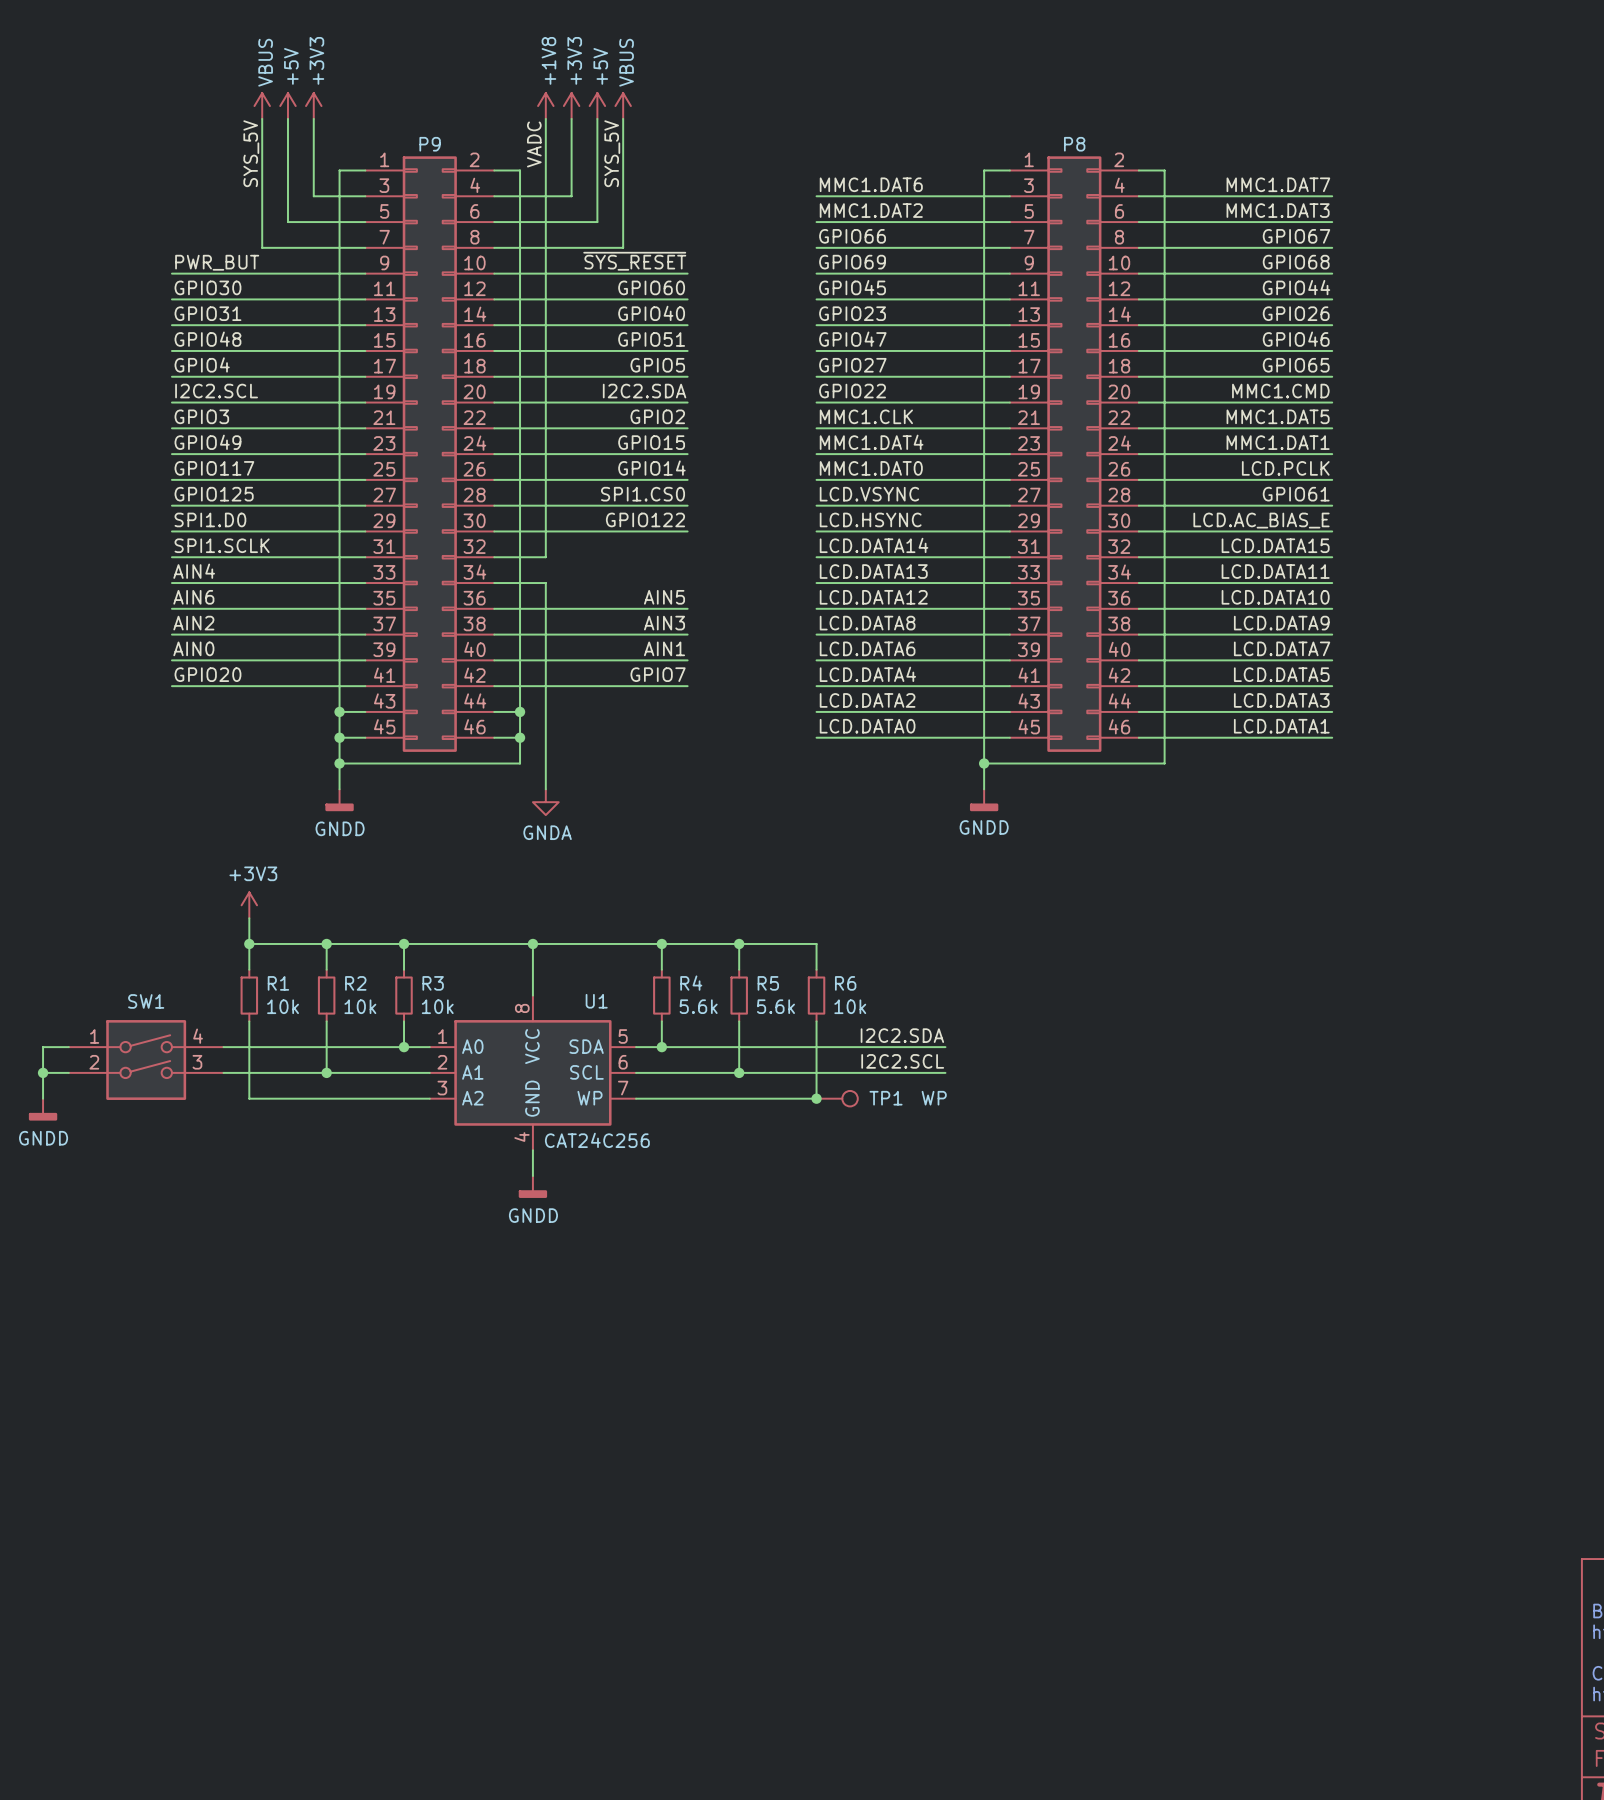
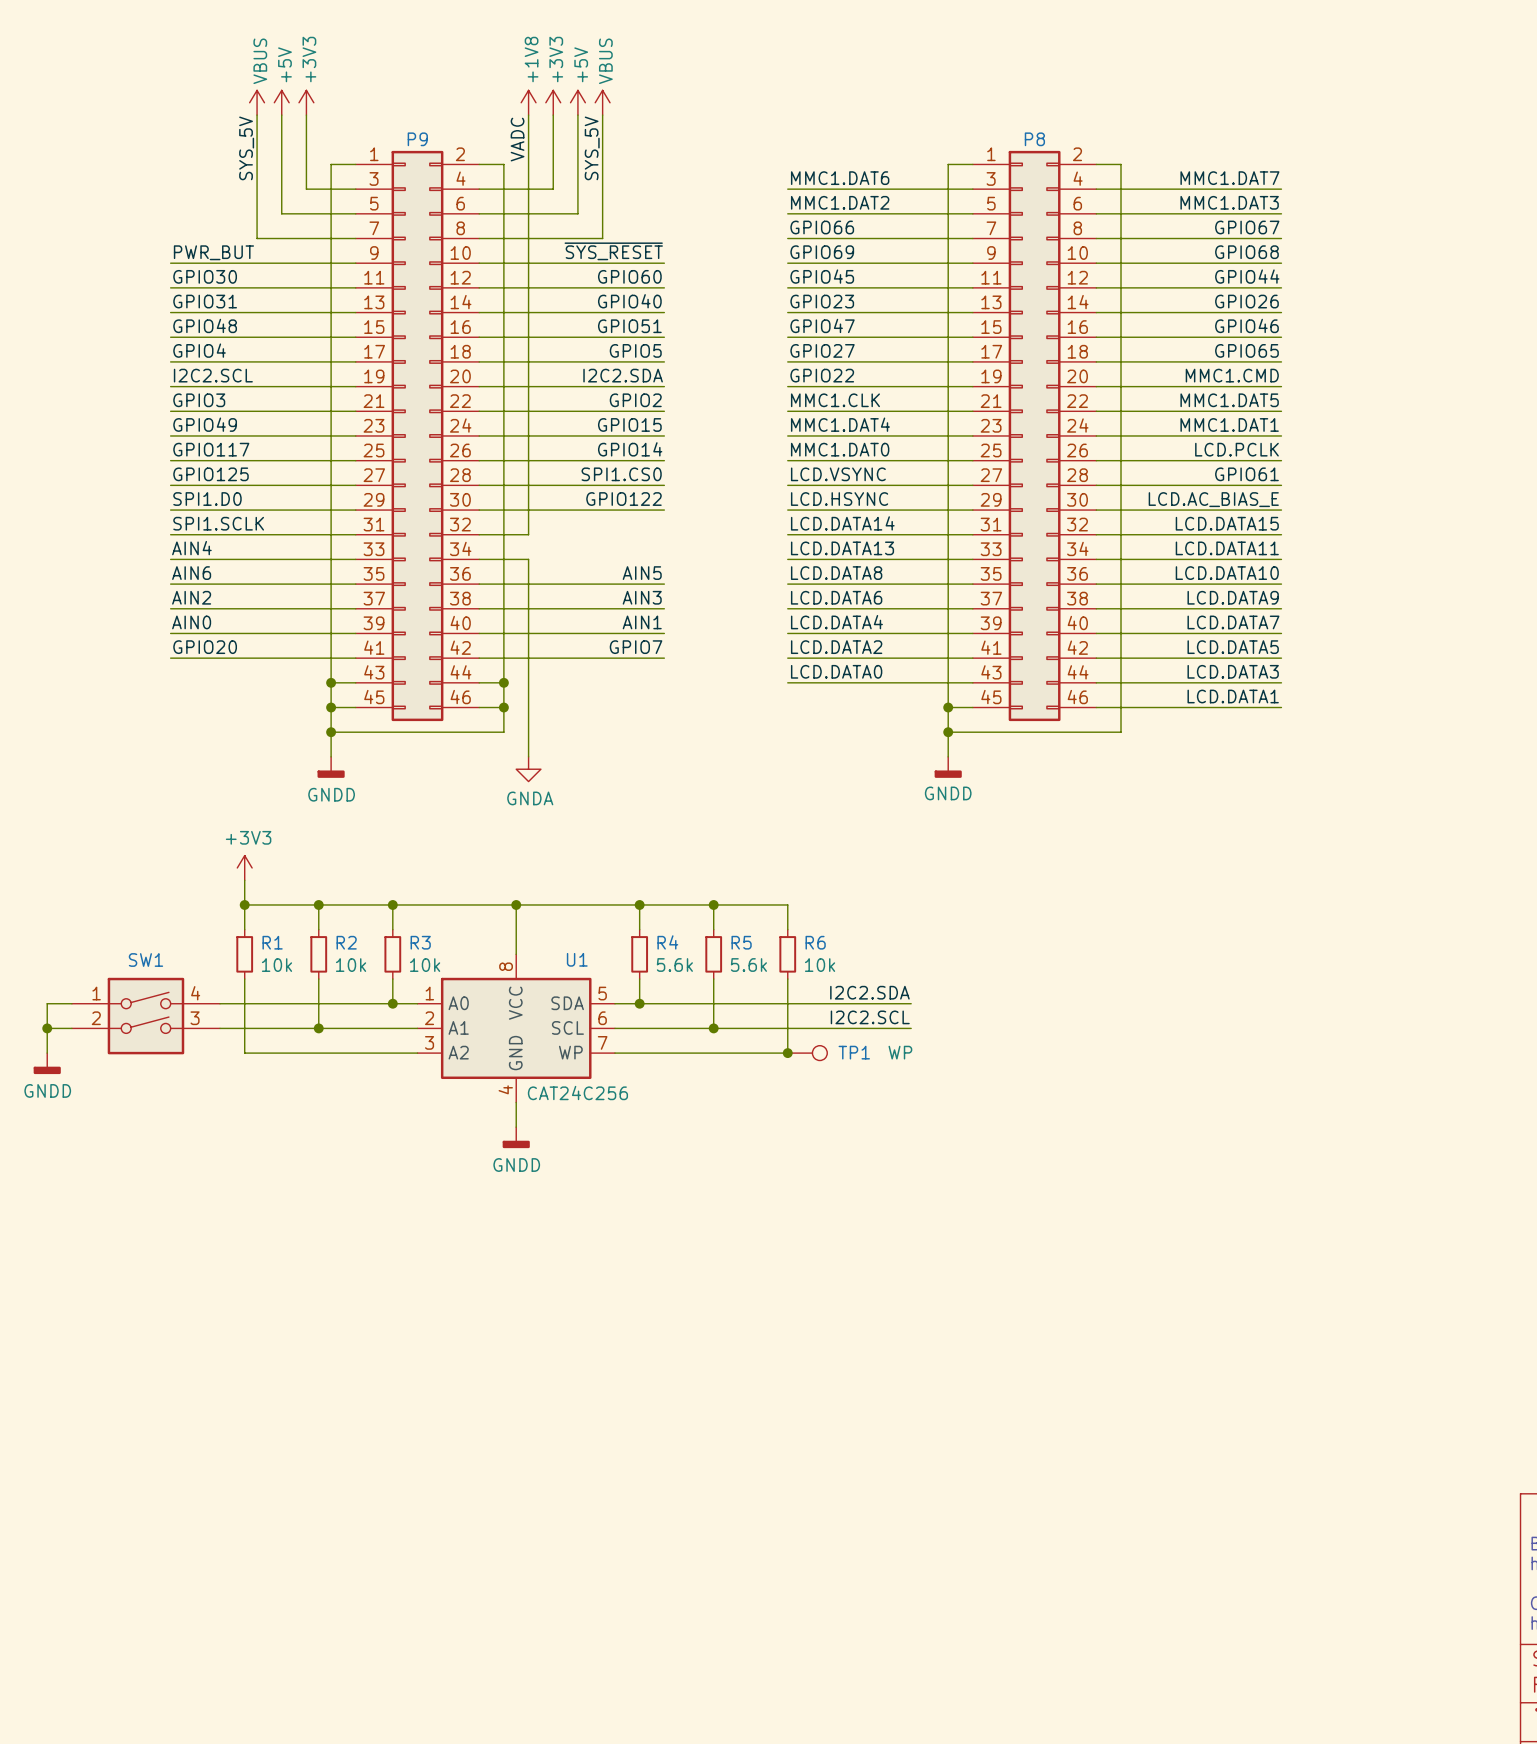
label: LCD.DATA12 (873, 597) -> LCD.DATA8 (836, 573)
label: LCD.DATA8 (867, 623) -> LCD.DATA6 (836, 597)
label: LCD.DATA6 (867, 648) -> LCD.DATA4 (836, 622)
label: LCD.DATA4 (867, 674) -> LCD.DATA2 (836, 647)
label: LCD.DATA2 (867, 700) -> LCD.DATA0 (836, 671)
label: LCD.DATA0 (867, 726) -> none
wire: (816, 737) (984, 737) -> none
junction: none -> (948, 707)

